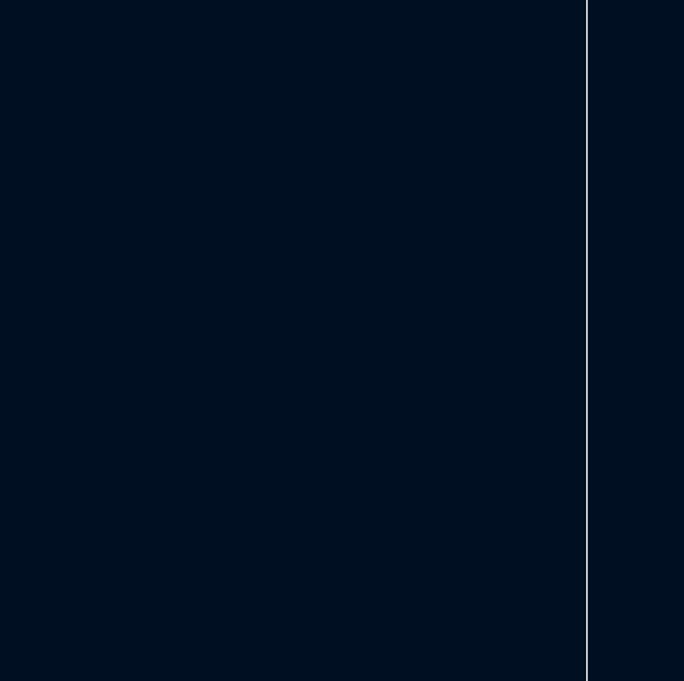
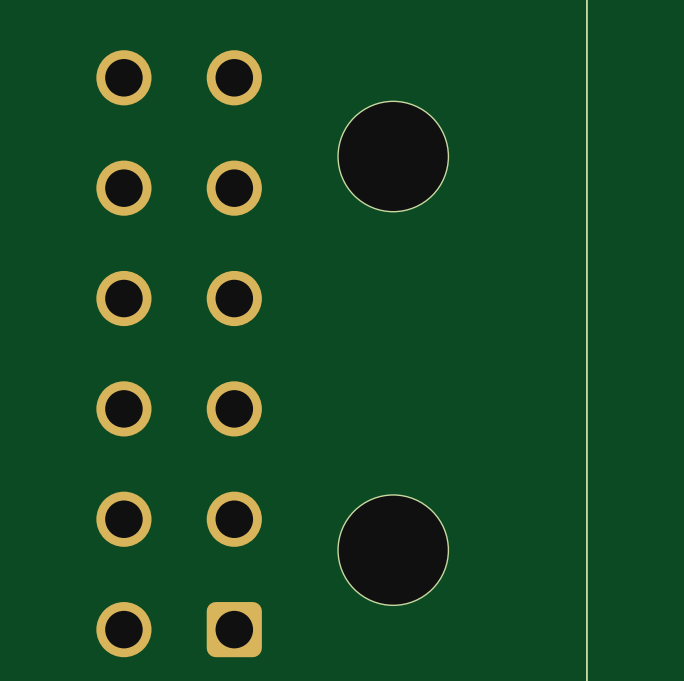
part: none -> (272, 353)

